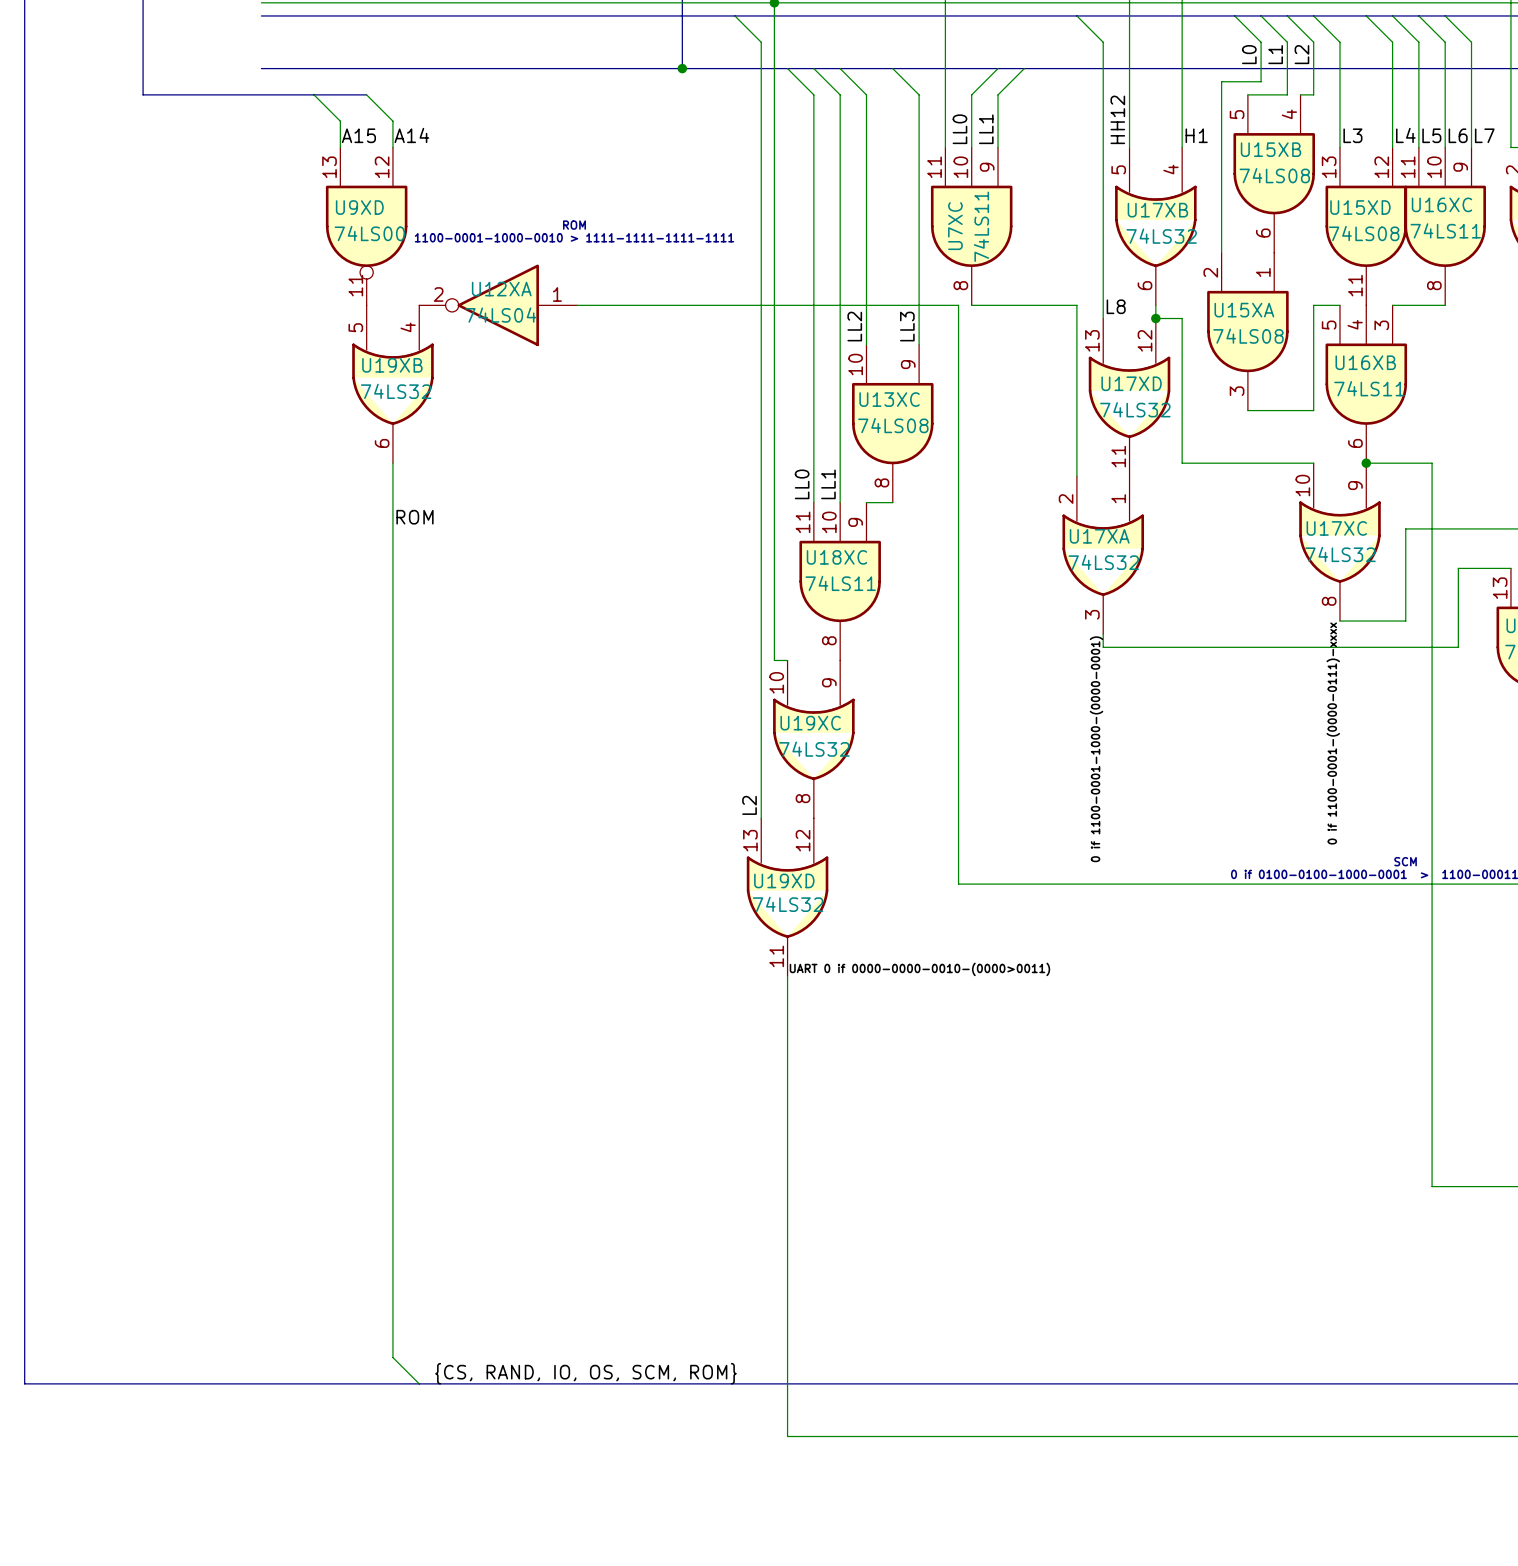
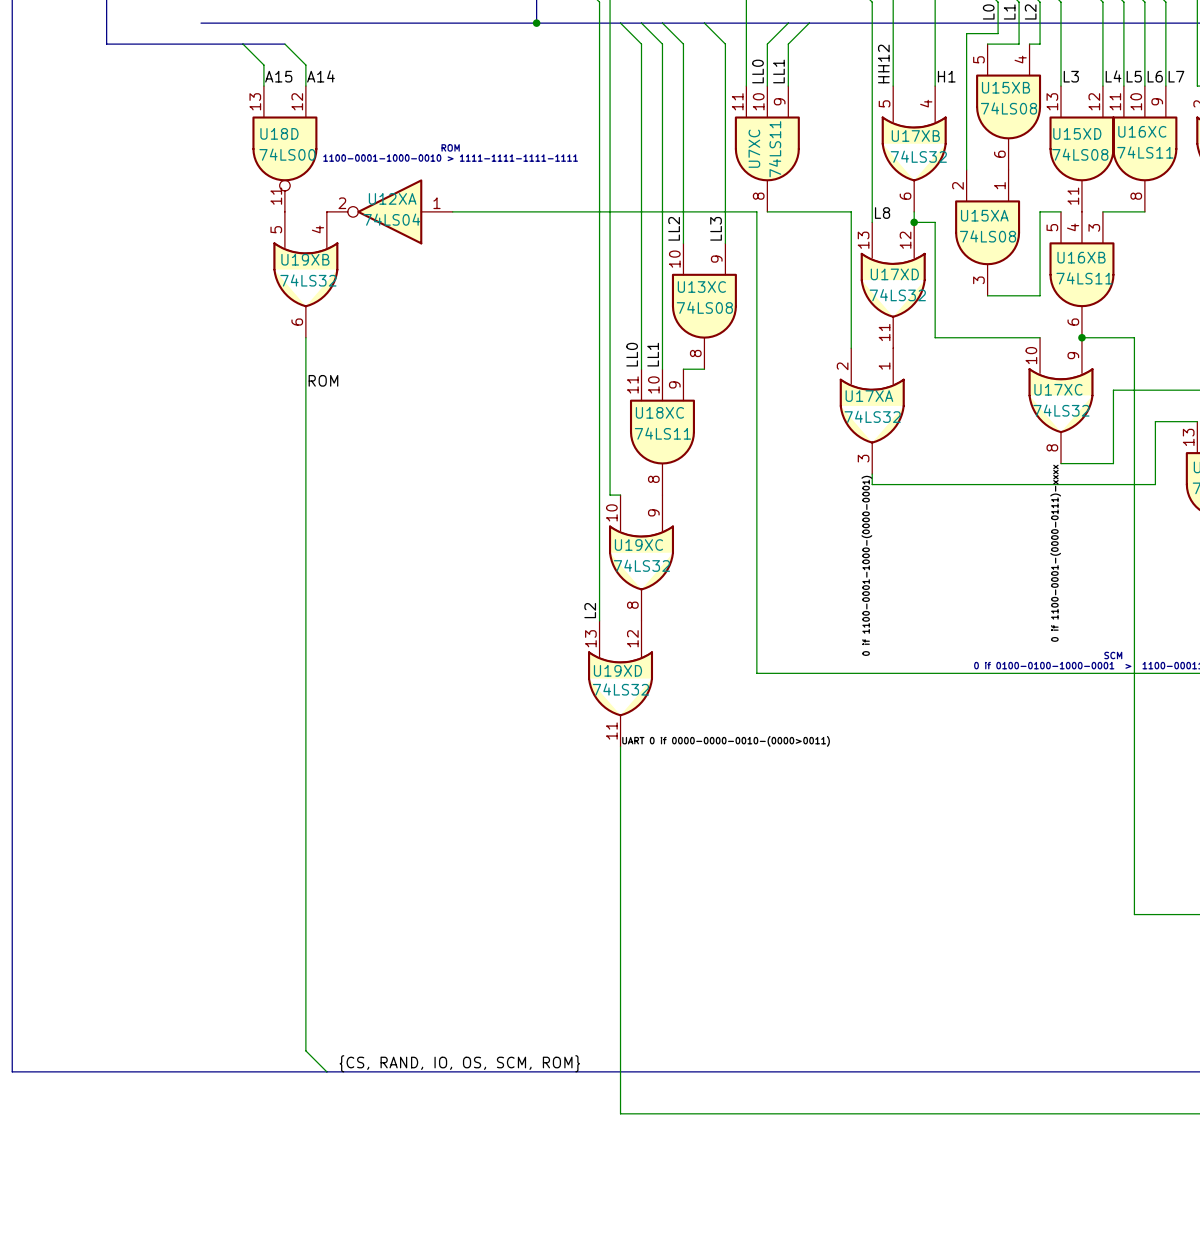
U9XD name: U9XD (359, 207) -> U18D (279, 133)

